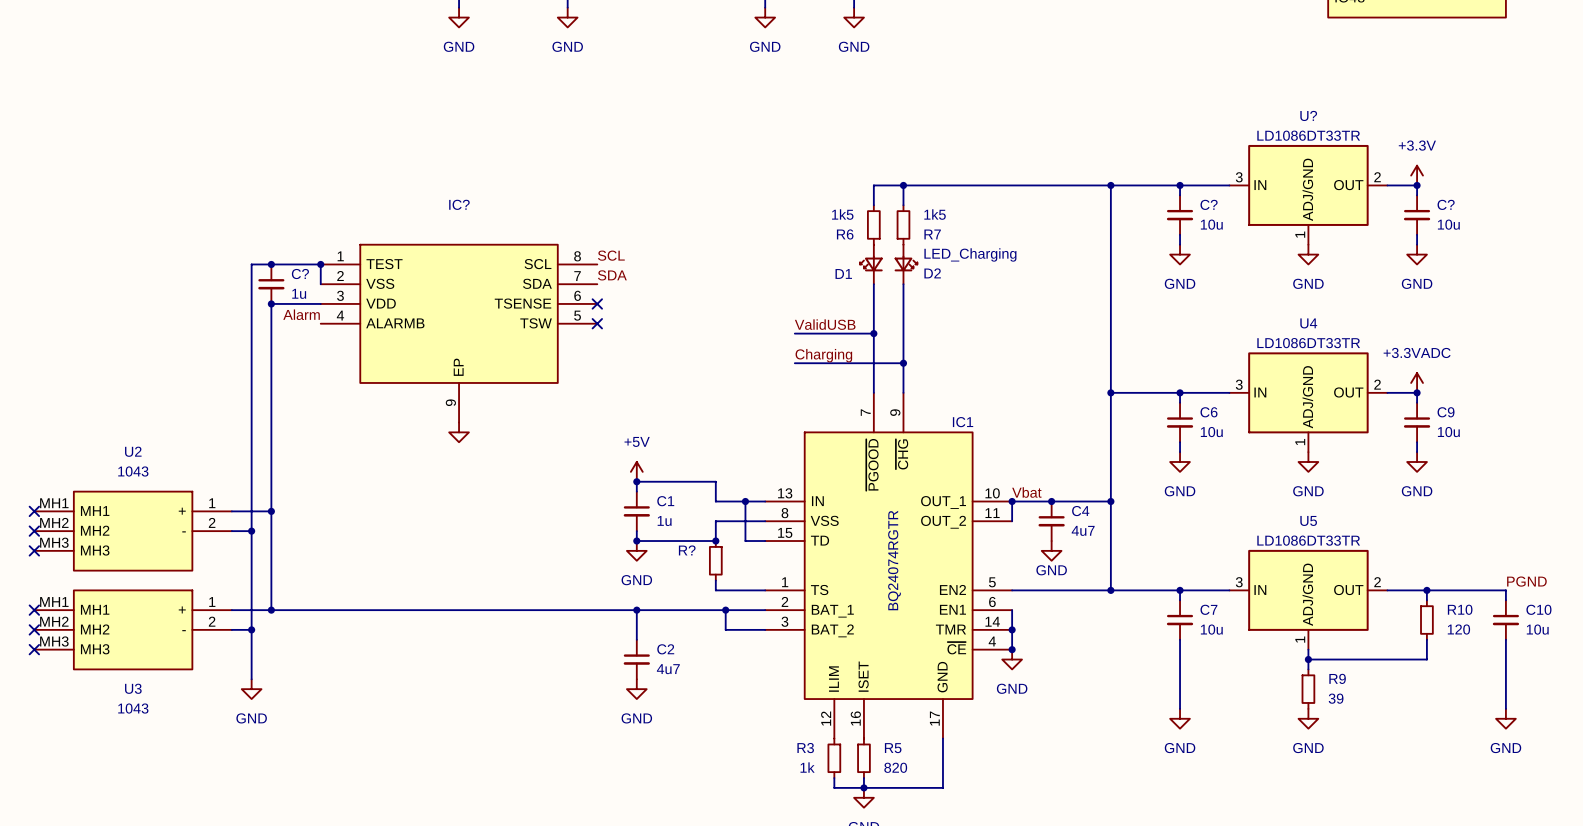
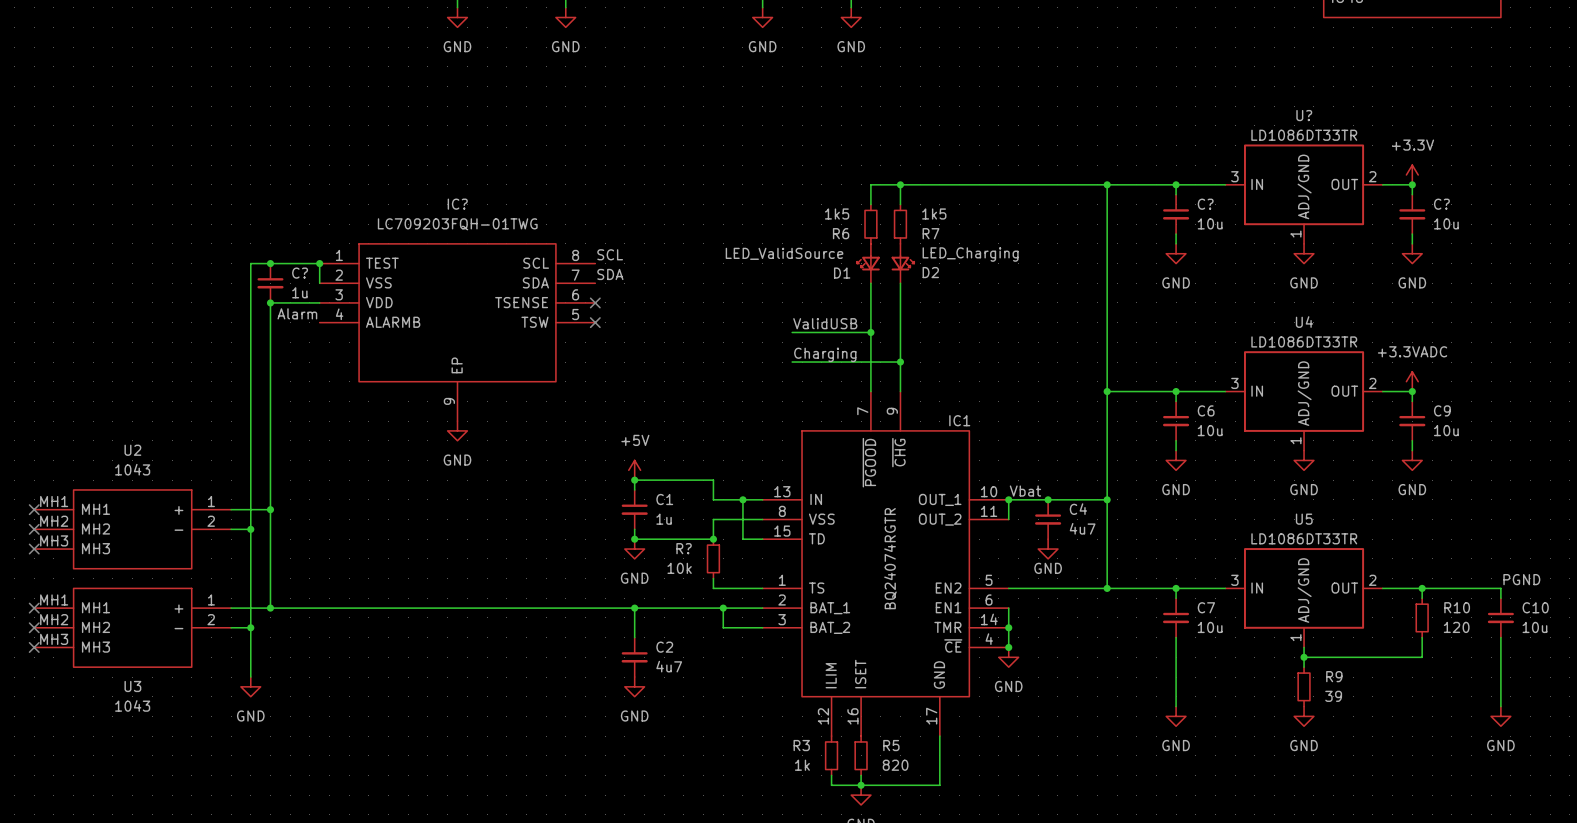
IC? value: none -> LC709203FQH-01TWG (457, 224)
D1 value: none -> LED_ValidSource (784, 253)
power symbol text: none -> GND (457, 460)
R? value: none -> 10k (679, 568)

